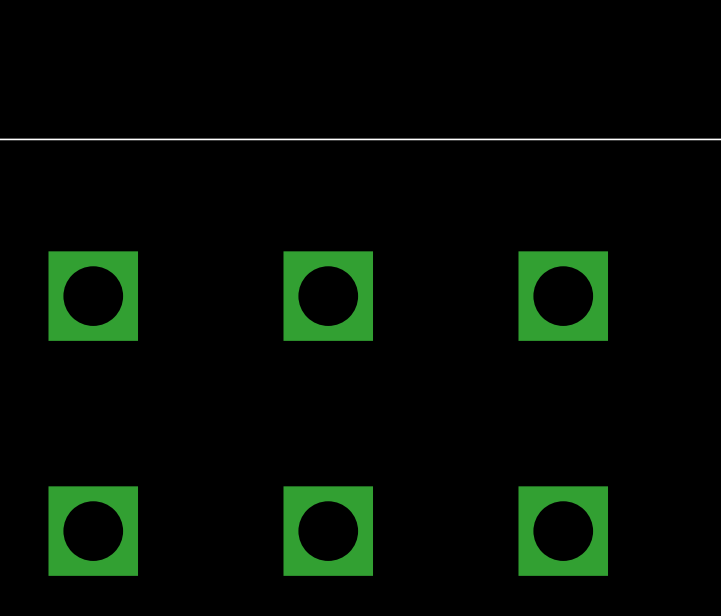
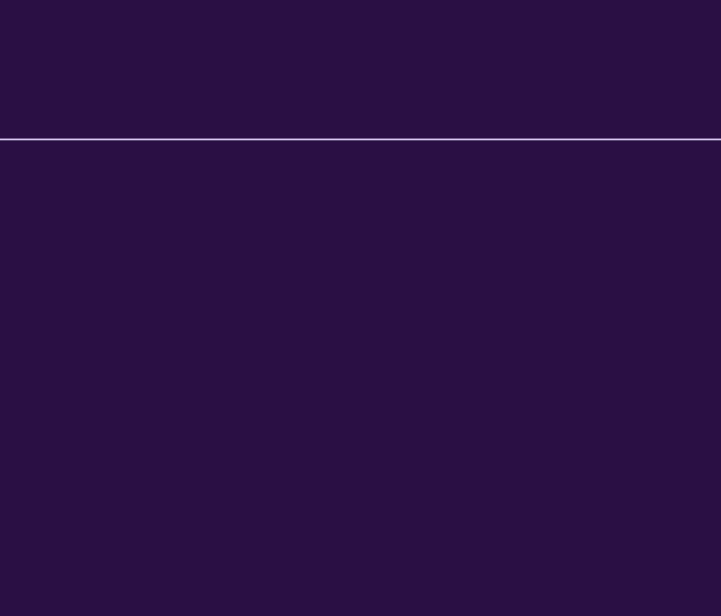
part: (93, 296) -> none
part: (328, 296) -> none
part: (563, 296) -> none
part: (93, 531) -> none
part: (328, 531) -> none
part: (563, 531) -> none

